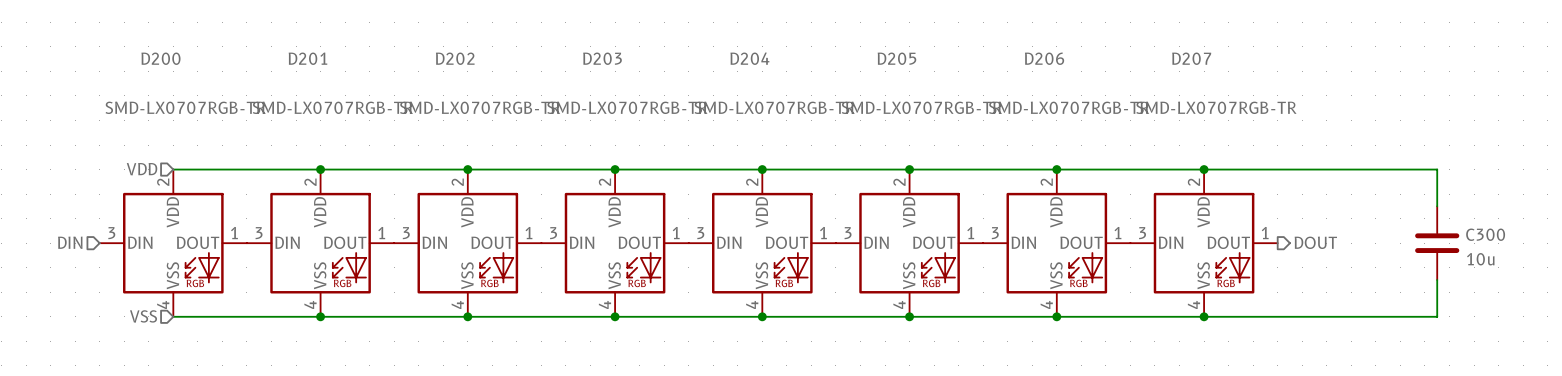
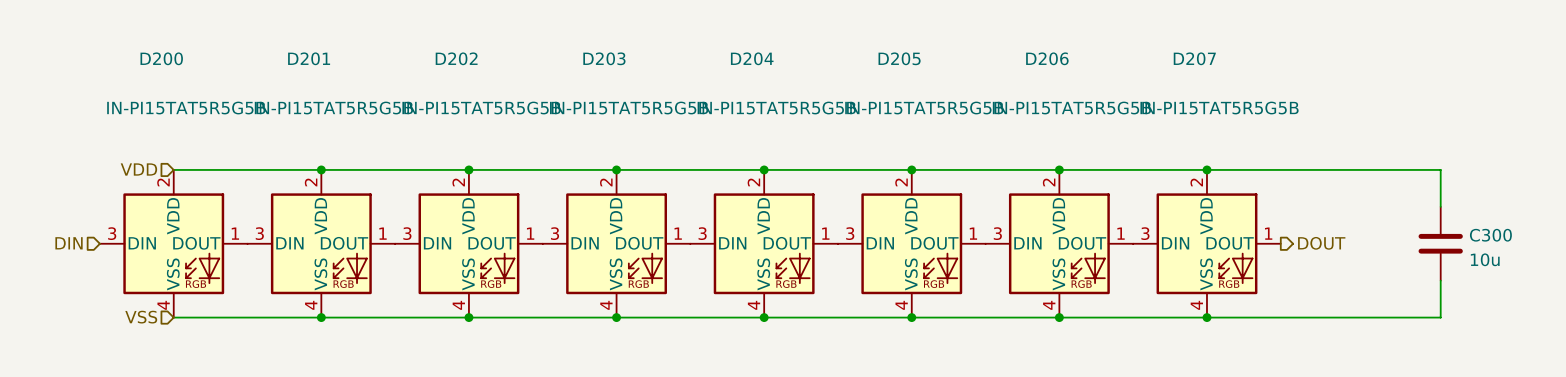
D200 value: SMD-LX0707RGB-TR (185, 107) -> IN-PI15TAT5R5G5B (186, 108)
D201 value: SMD-LX0707RGB-TR (332, 107) -> IN-PI15TAT5R5G5B (333, 108)
D202 value: SMD-LX0707RGB-TR (480, 107) -> IN-PI15TAT5R5G5B (481, 108)
D203 value: SMD-LX0707RGB-TR (627, 107) -> IN-PI15TAT5R5G5B (629, 108)
D204 value: SMD-LX0707RGB-TR (774, 107) -> IN-PI15TAT5R5G5B (776, 108)
D205 value: SMD-LX0707RGB-TR (921, 107) -> IN-PI15TAT5R5G5B (924, 108)
D206 value: SMD-LX0707RGB-TR (1069, 107) -> IN-PI15TAT5R5G5B (1071, 108)
D207 value: SMD-LX0707RGB-TR (1216, 107) -> IN-PI15TAT5R5G5B (1219, 108)

